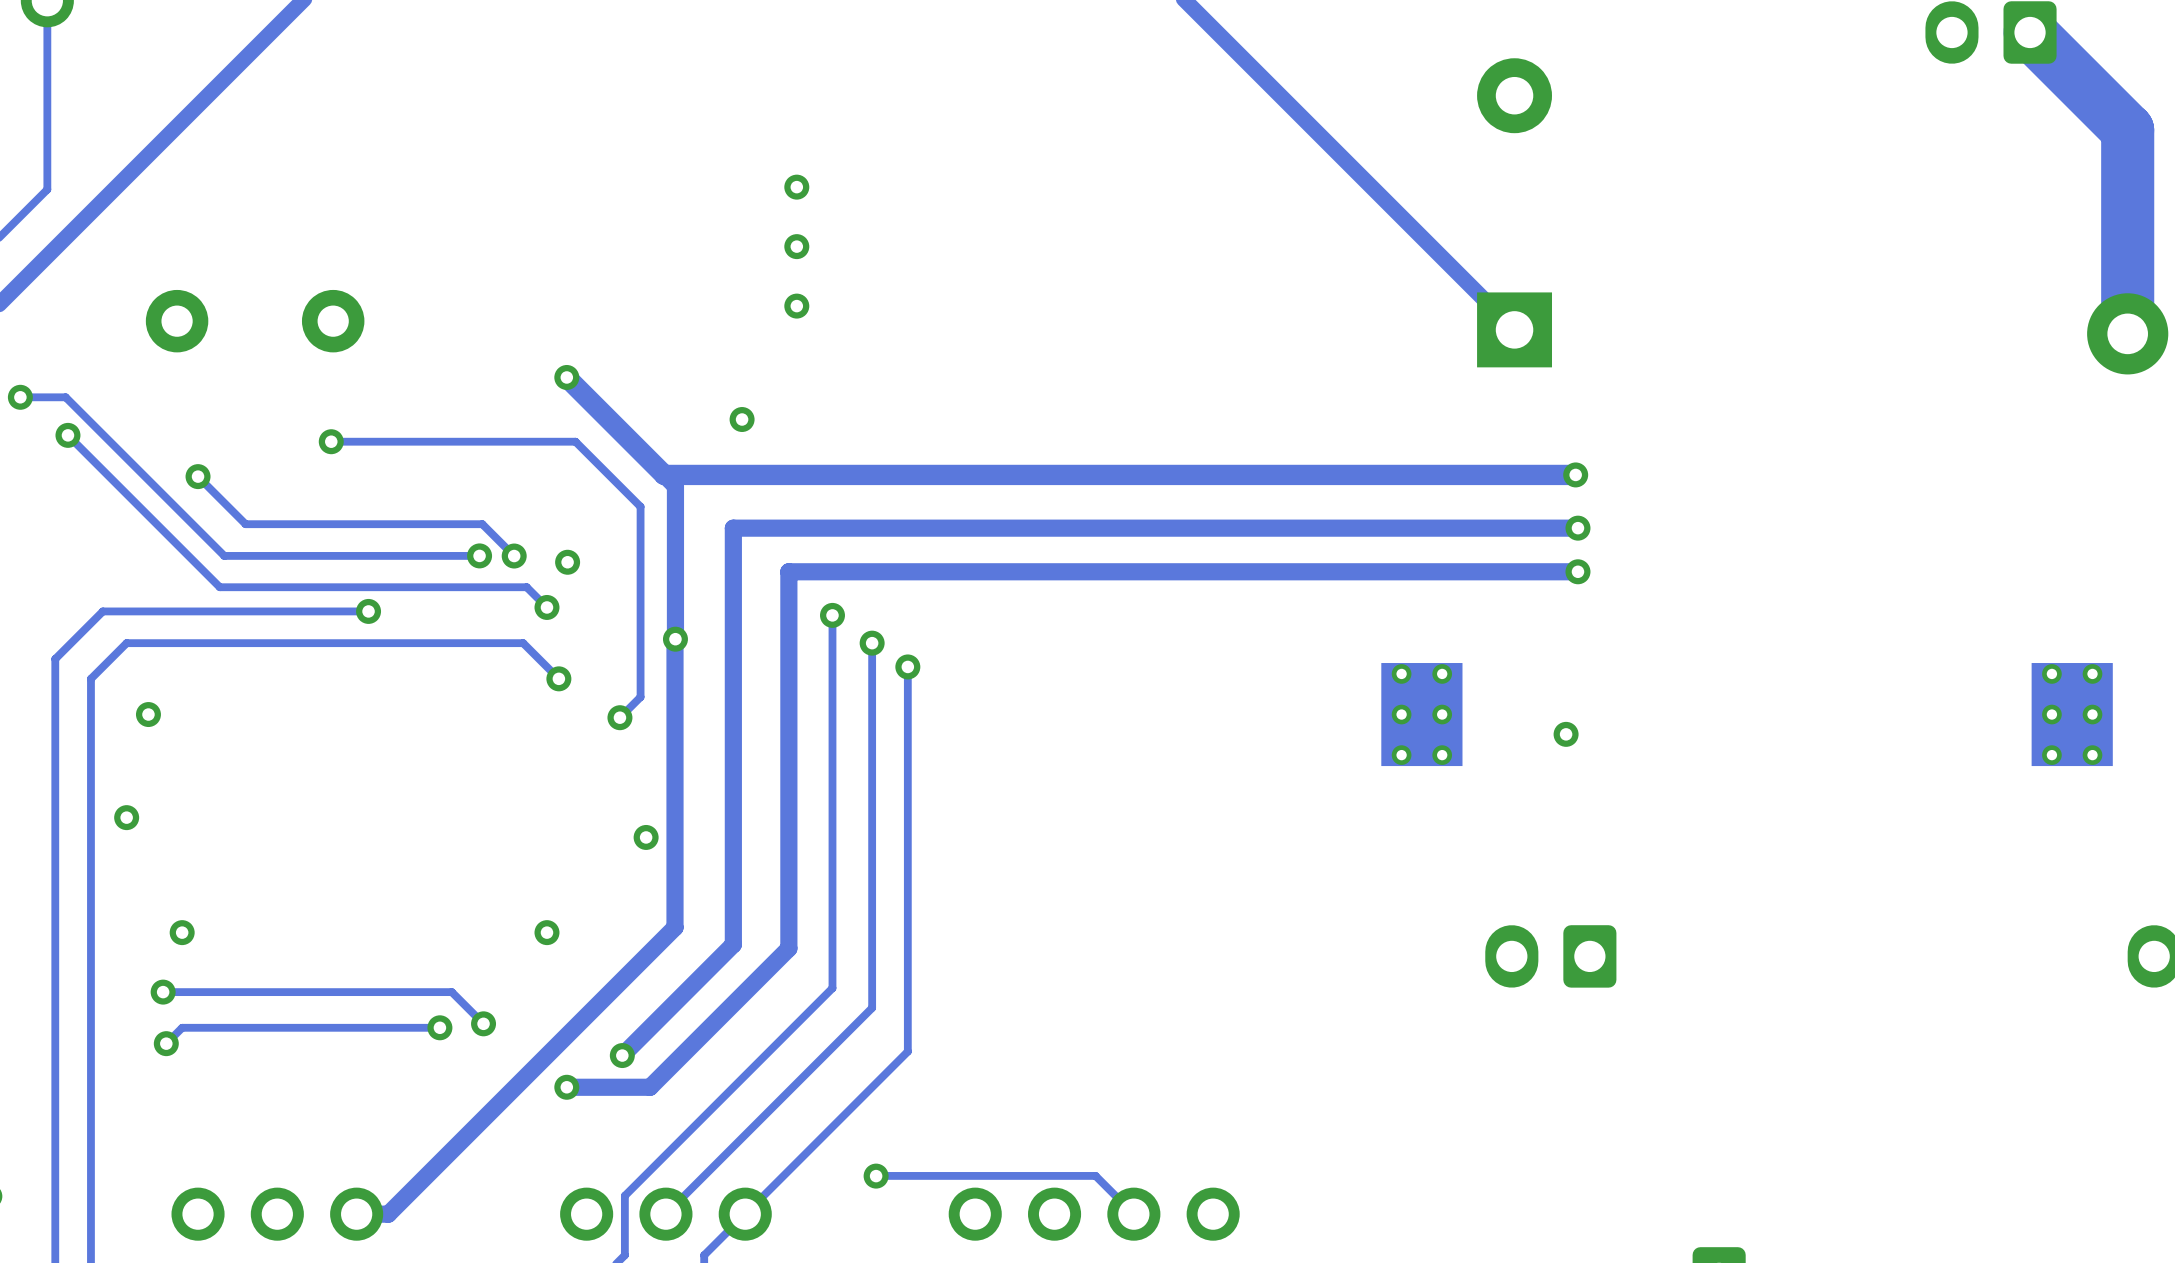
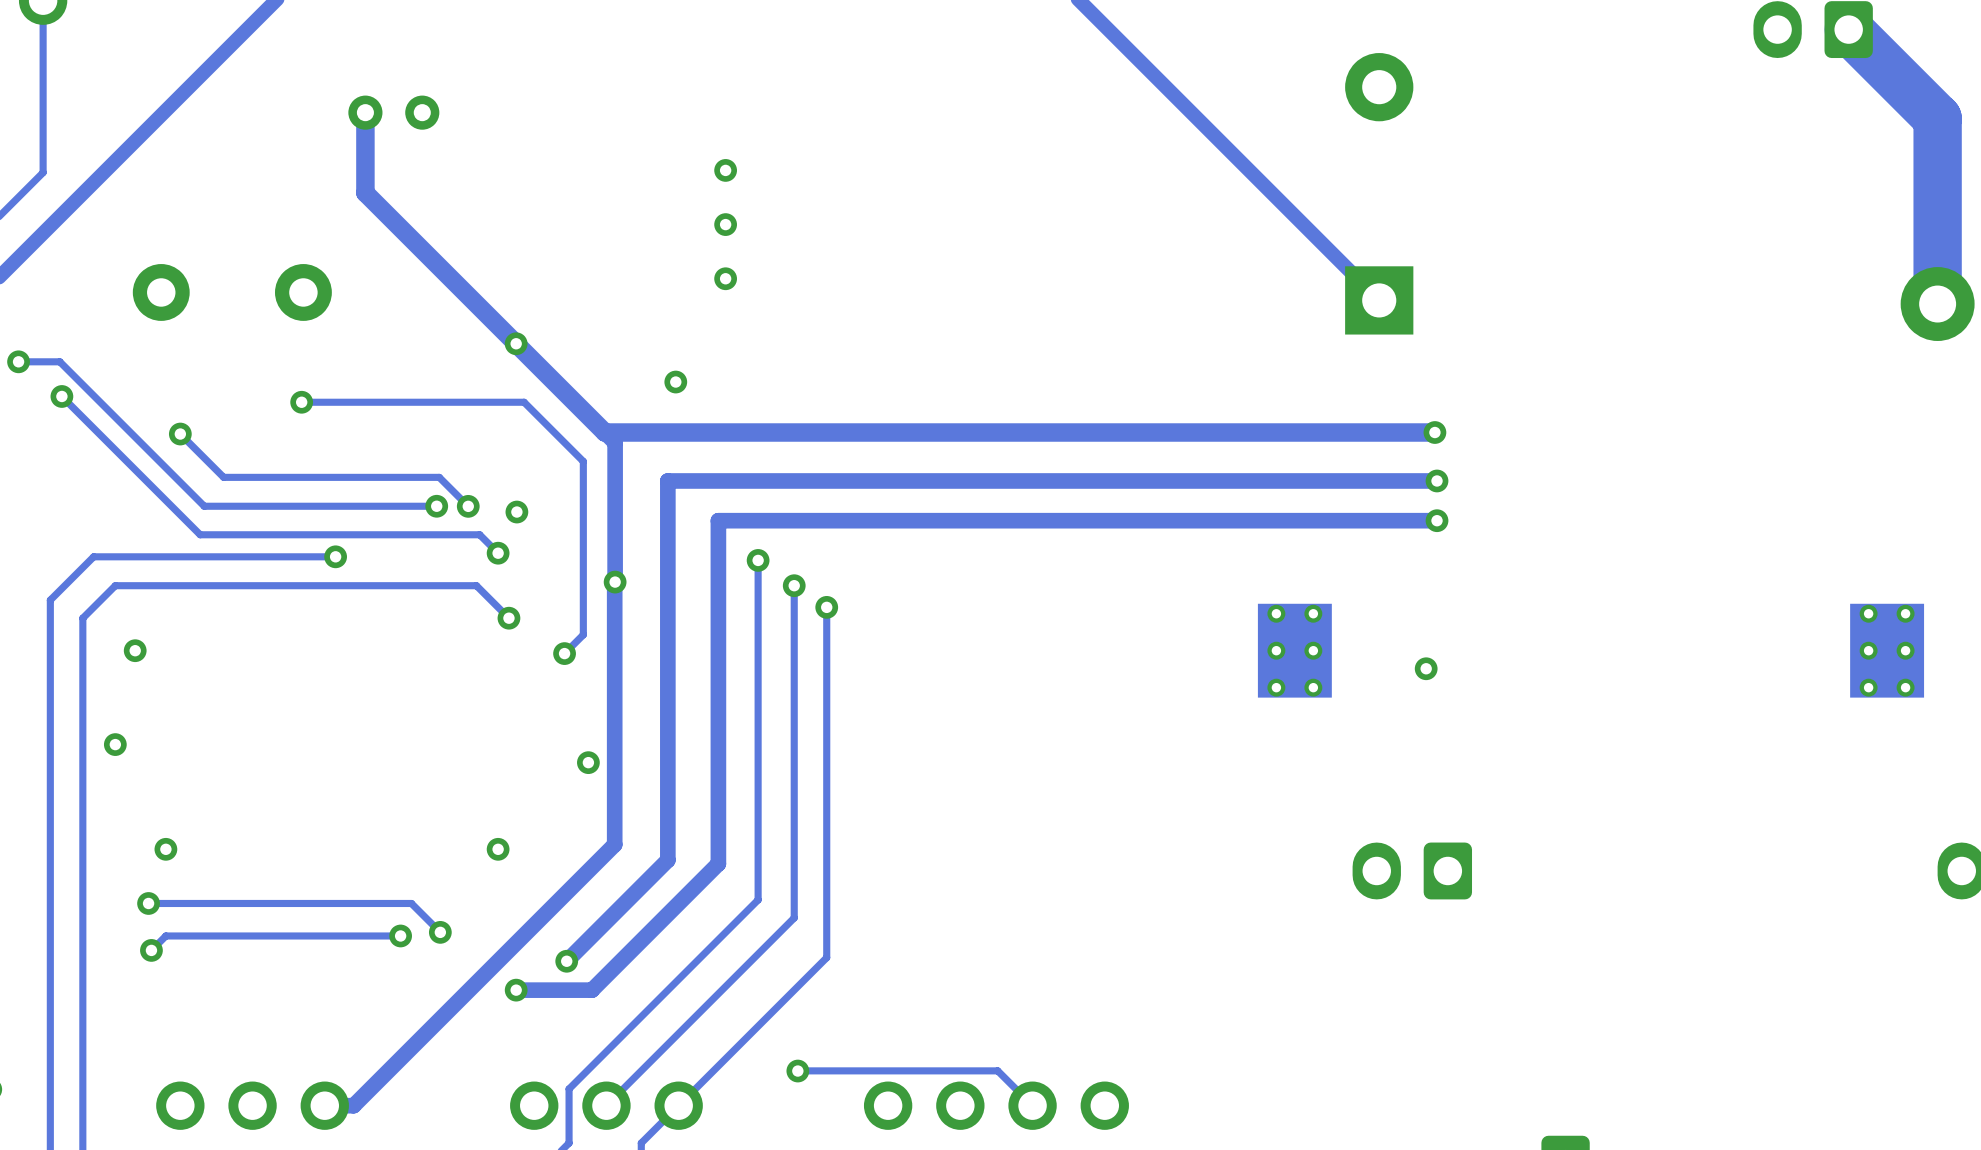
track: none -> (365, 112) (365, 192) (516, 343)
part: none -> (393, 112)

